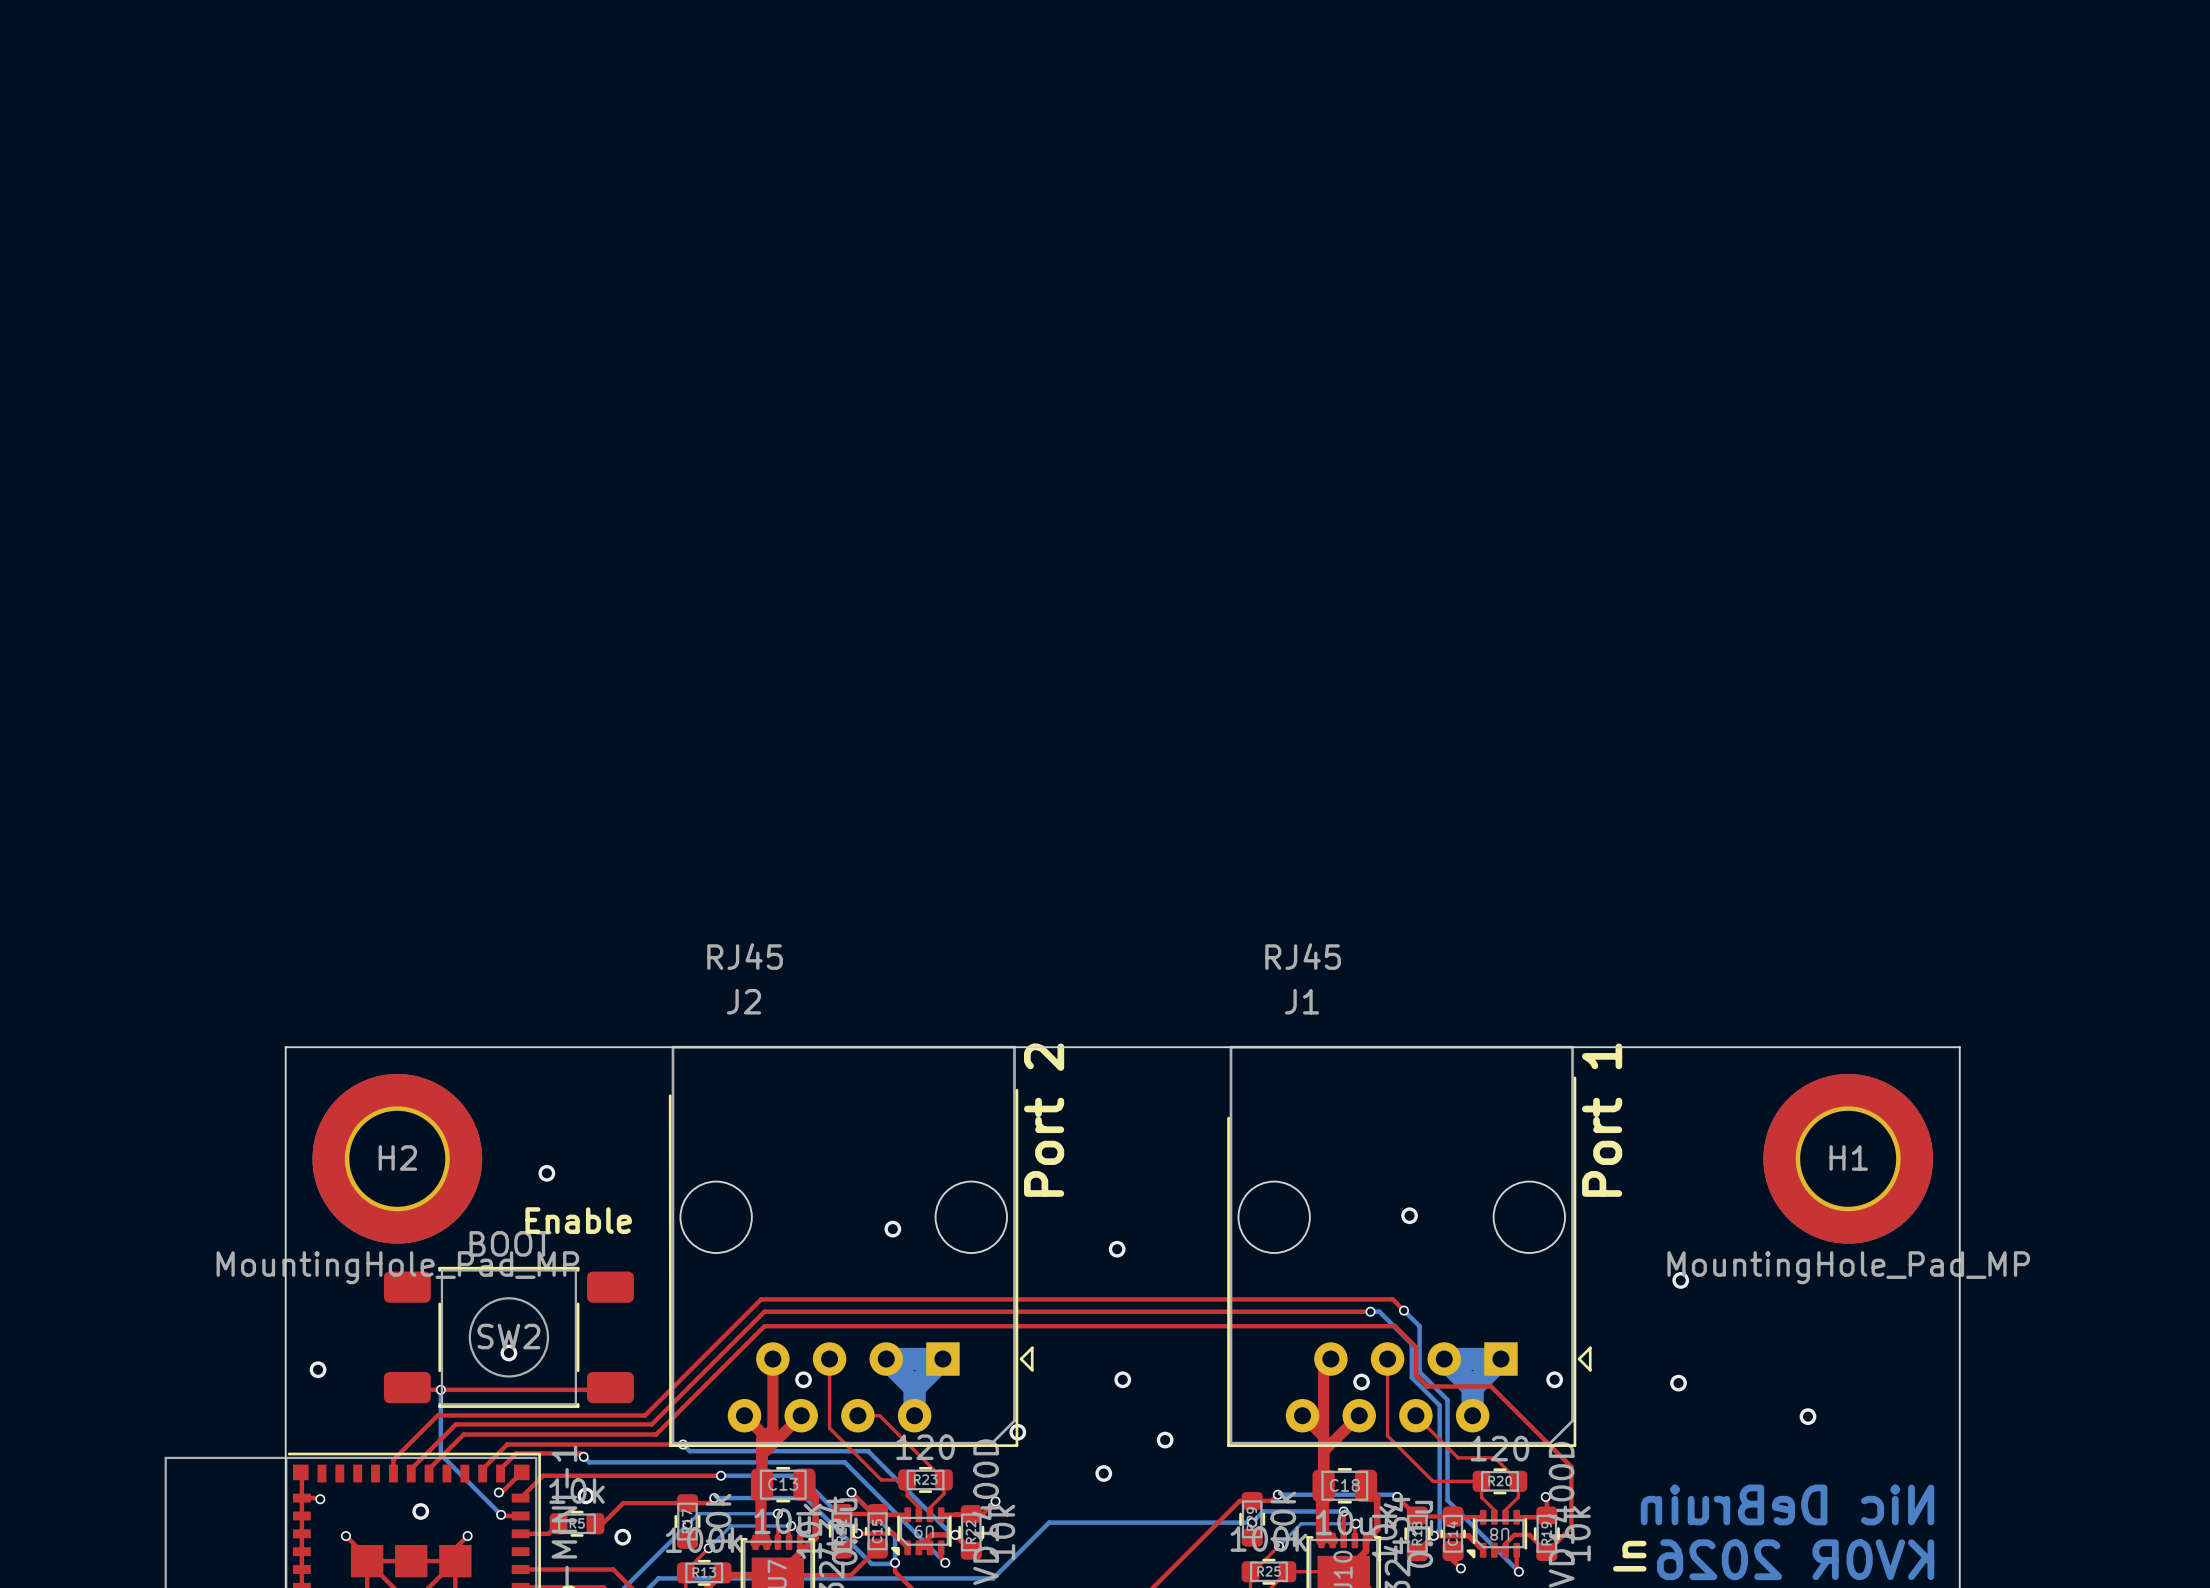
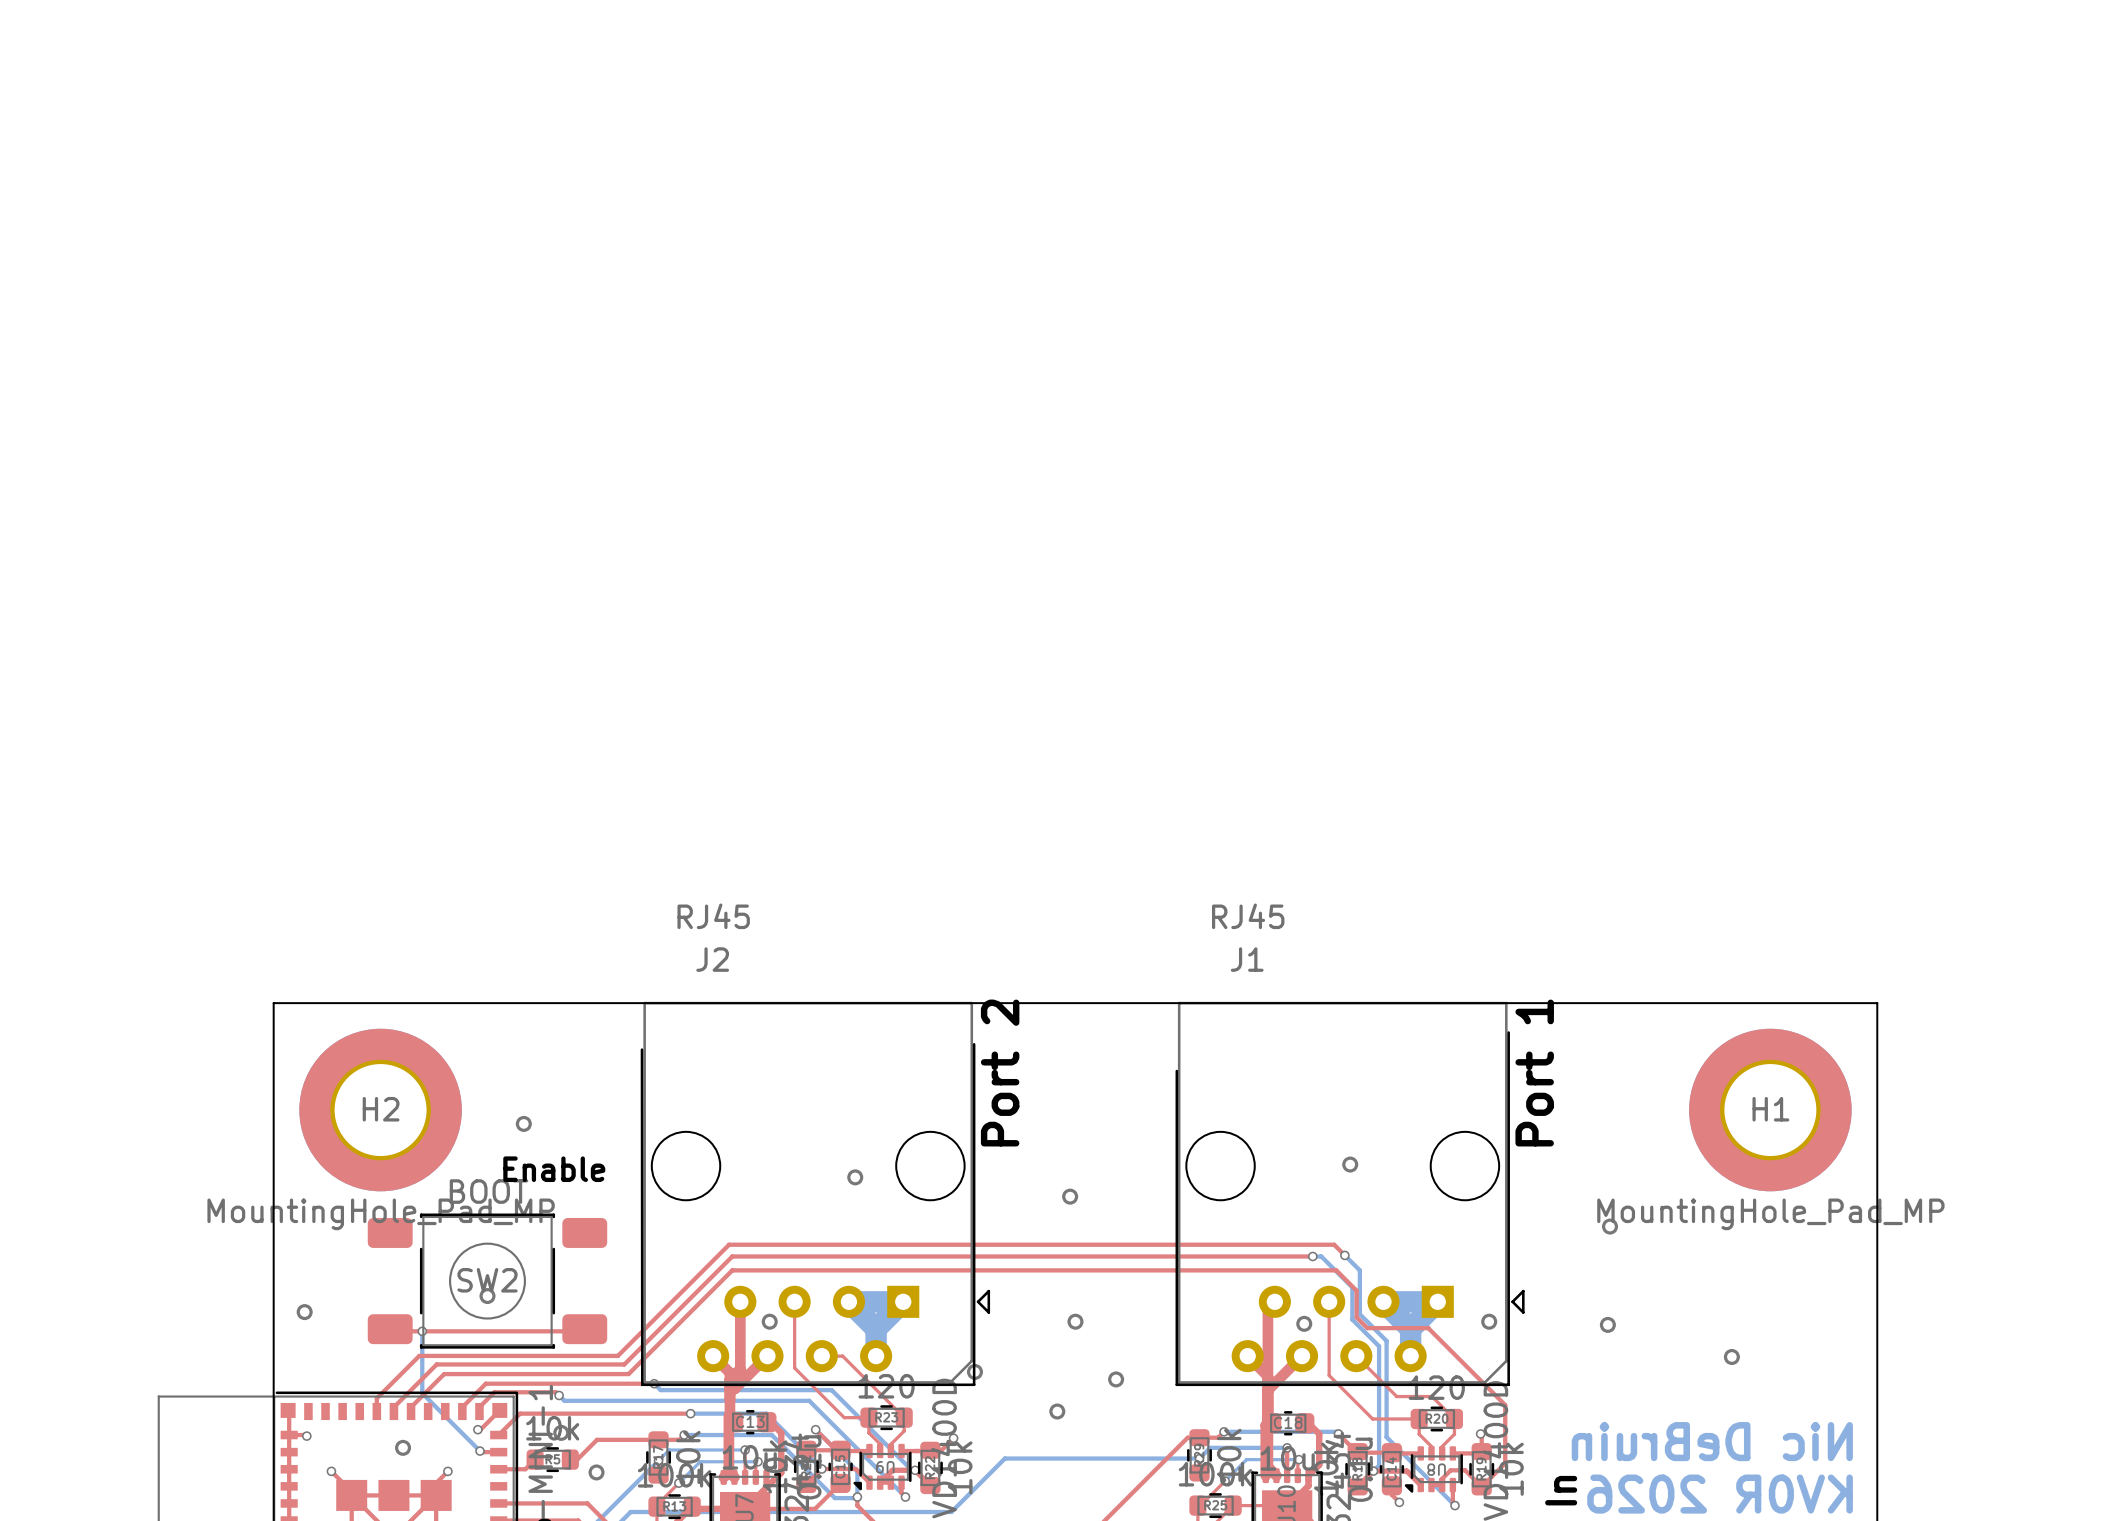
C13 footprint: [750, 1466, 816, 1503] -> [724, 1410, 777, 1435]
C18 footprint: [1312, 1468, 1378, 1504] -> [1262, 1411, 1315, 1436]

